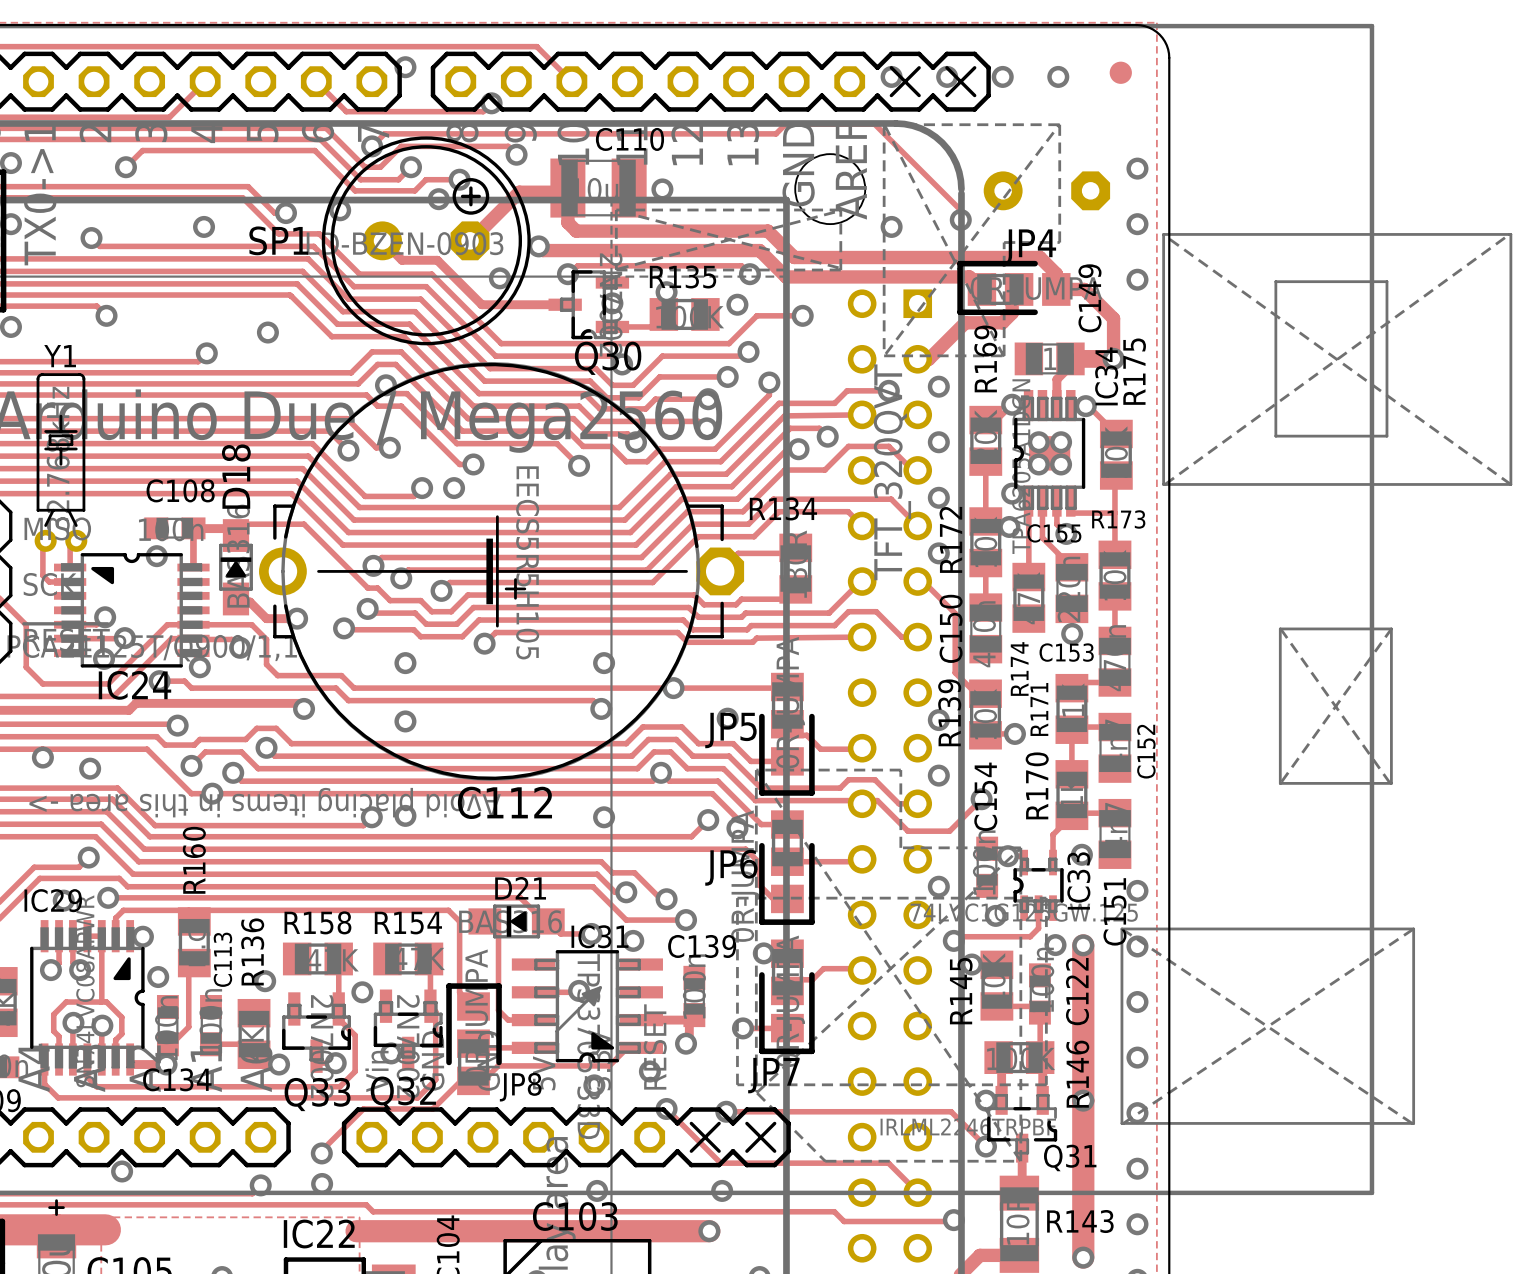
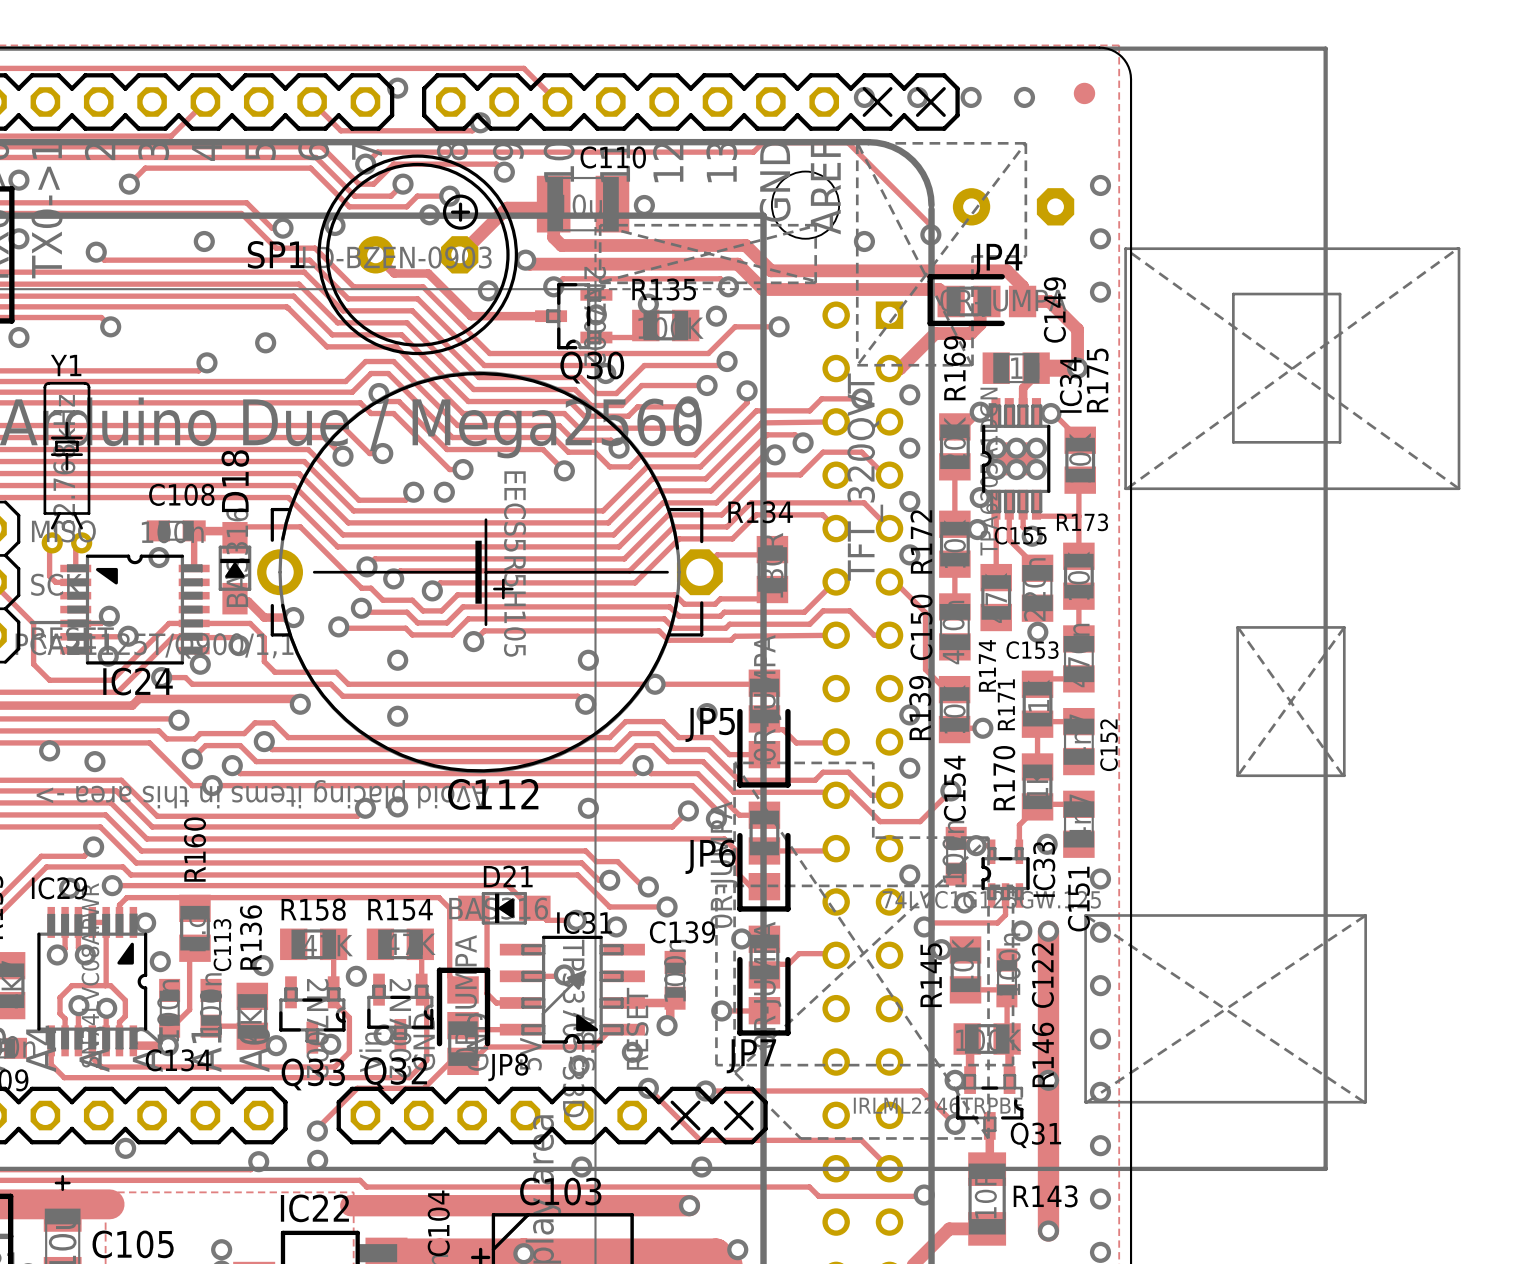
via: none -> (996, 448)
via: (1038, 442) -> none
via: none -> (1016, 448)
via: (1061, 442) -> none
via: none -> (1036, 448)
via: none -> (996, 469)
via: (1038, 464) -> none
via: none -> (1016, 469)
via: (1061, 464) -> none
via: none -> (1036, 469)

